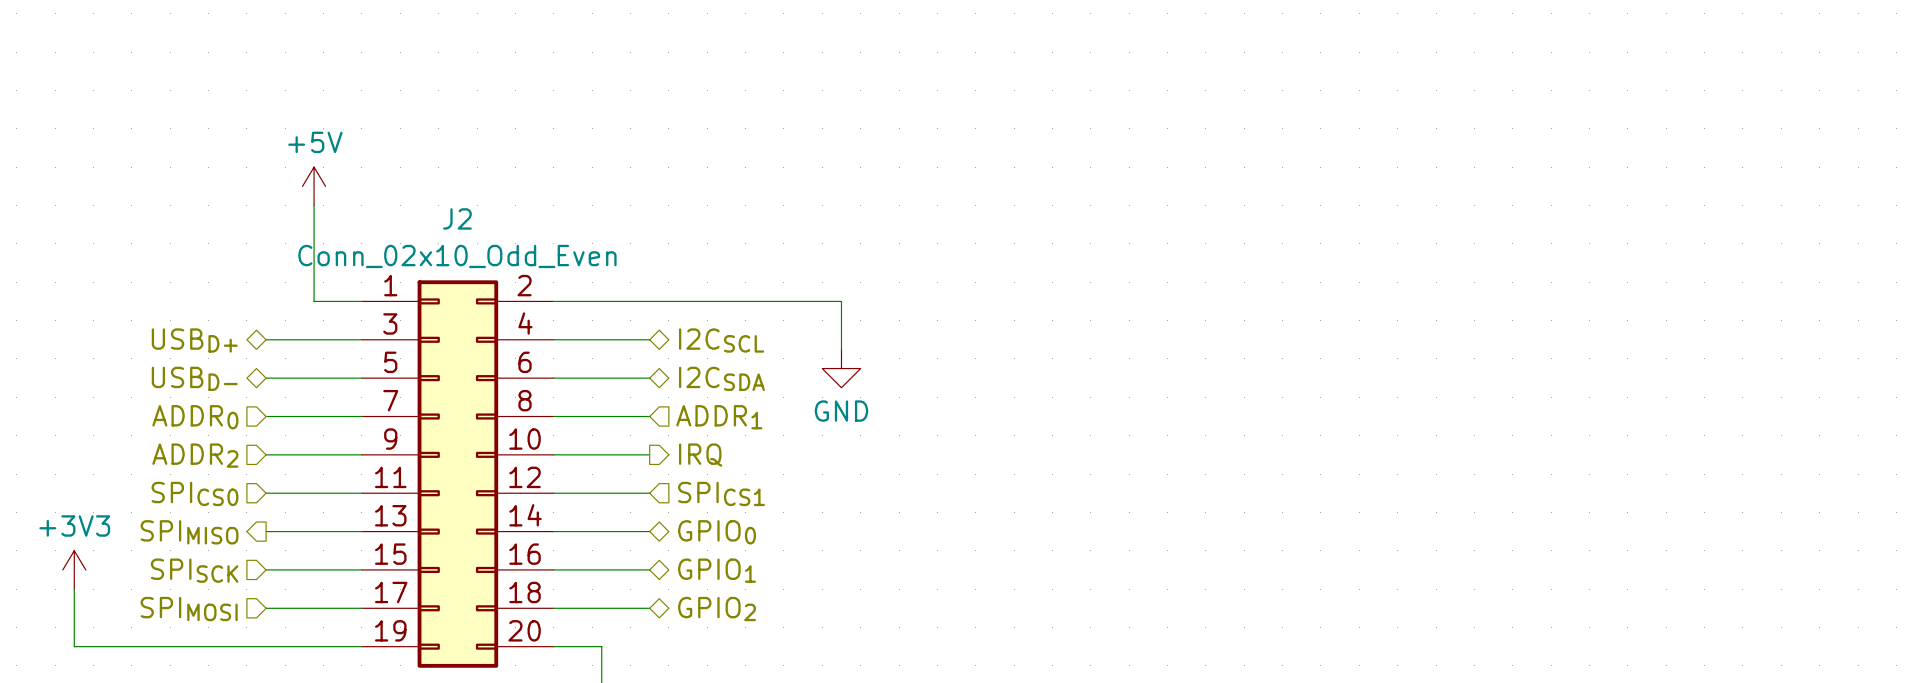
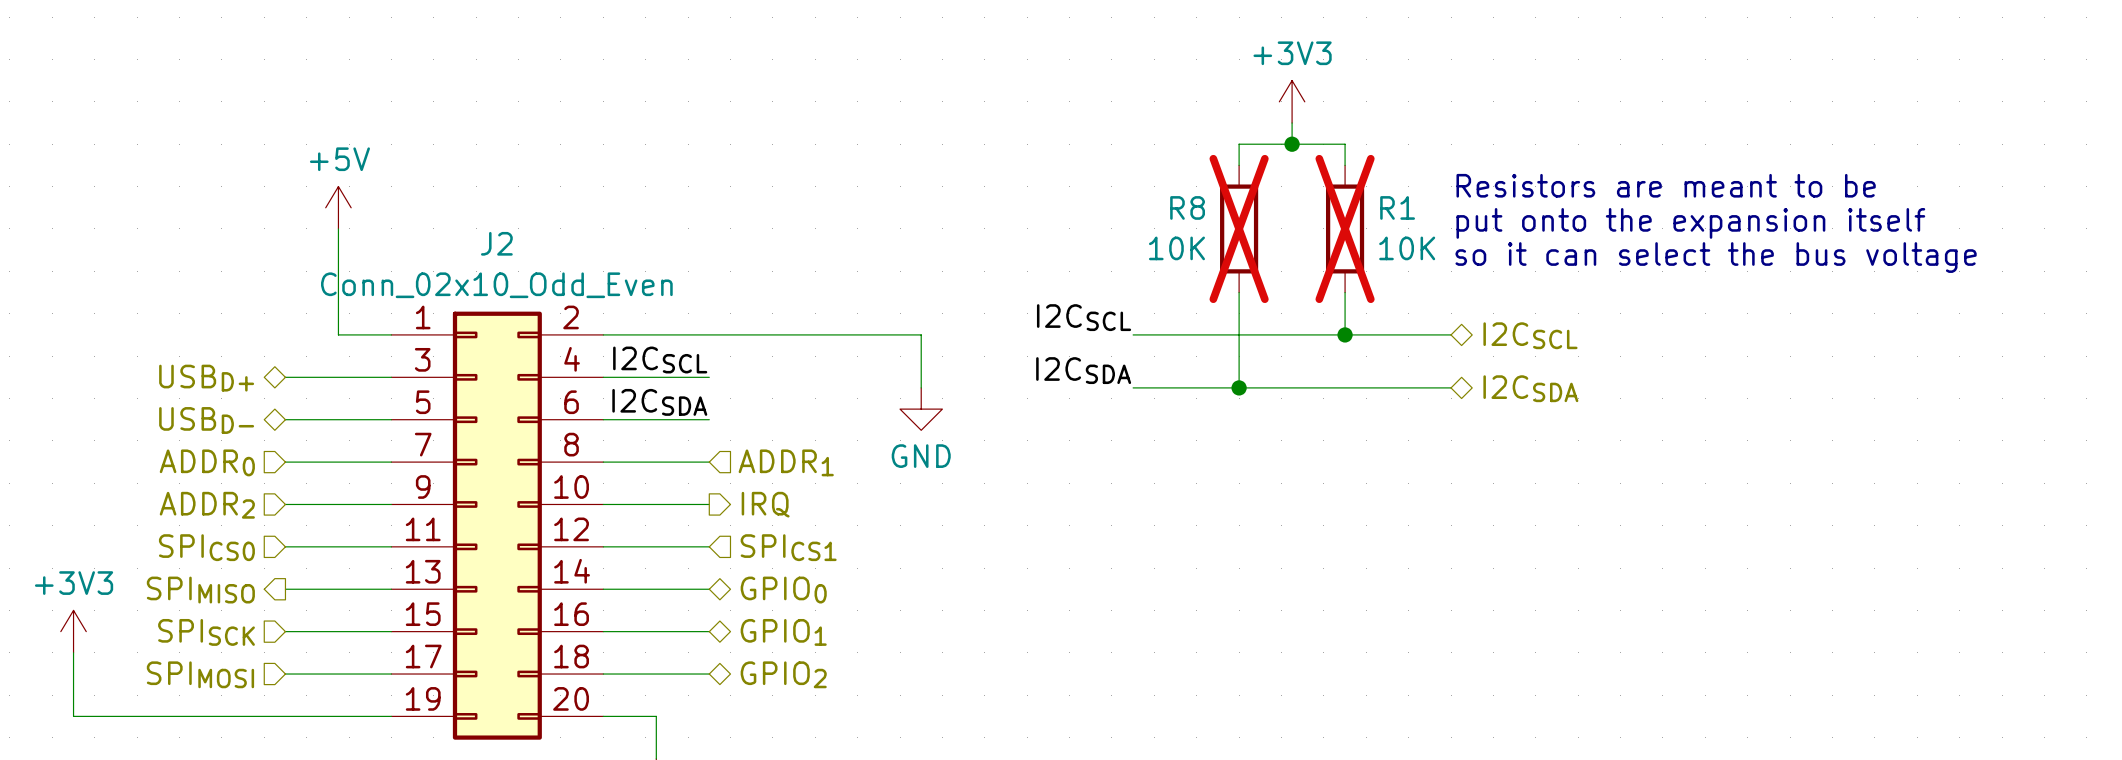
power symbol: none -> +3V3 (1292, 101)
wire: none -> (1292, 123) (1292, 144)
junction: none -> (1292, 144)
wire: none -> (1239, 165) (1239, 144) (1345, 144) (1345, 165)
text: none -> Resistors are meant to be (1666, 185)
text: none -> put onto the expansion itself (1690, 223)
R8: none -> 10K (1239, 228)
R1: none -> 10K (1345, 228)
text: none -> so it can select the bus voltage (1716, 257)
wire: none -> (1239, 292) (1239, 387)
wire: none -> (1345, 292) (1345, 334)
label: none -> I2CSCL (1084, 317)
wire: none -> (1133, 334) (1451, 334)
junction: none -> (1345, 334)
hierarchical label: none -> I2CSCL (1530, 335)
label: none -> I2CSCL (660, 360)
label: none -> I2CSDA (1083, 370)
hierarchical label: I2CSCL (721, 340) -> none
wire: none -> (1133, 387) (1451, 387)
junction: none -> (1239, 387)
hierarchical label: none -> I2CSDA (1530, 388)
label: none -> I2CSDA (659, 402)
hierarchical label: I2CSDA (721, 378) -> none

